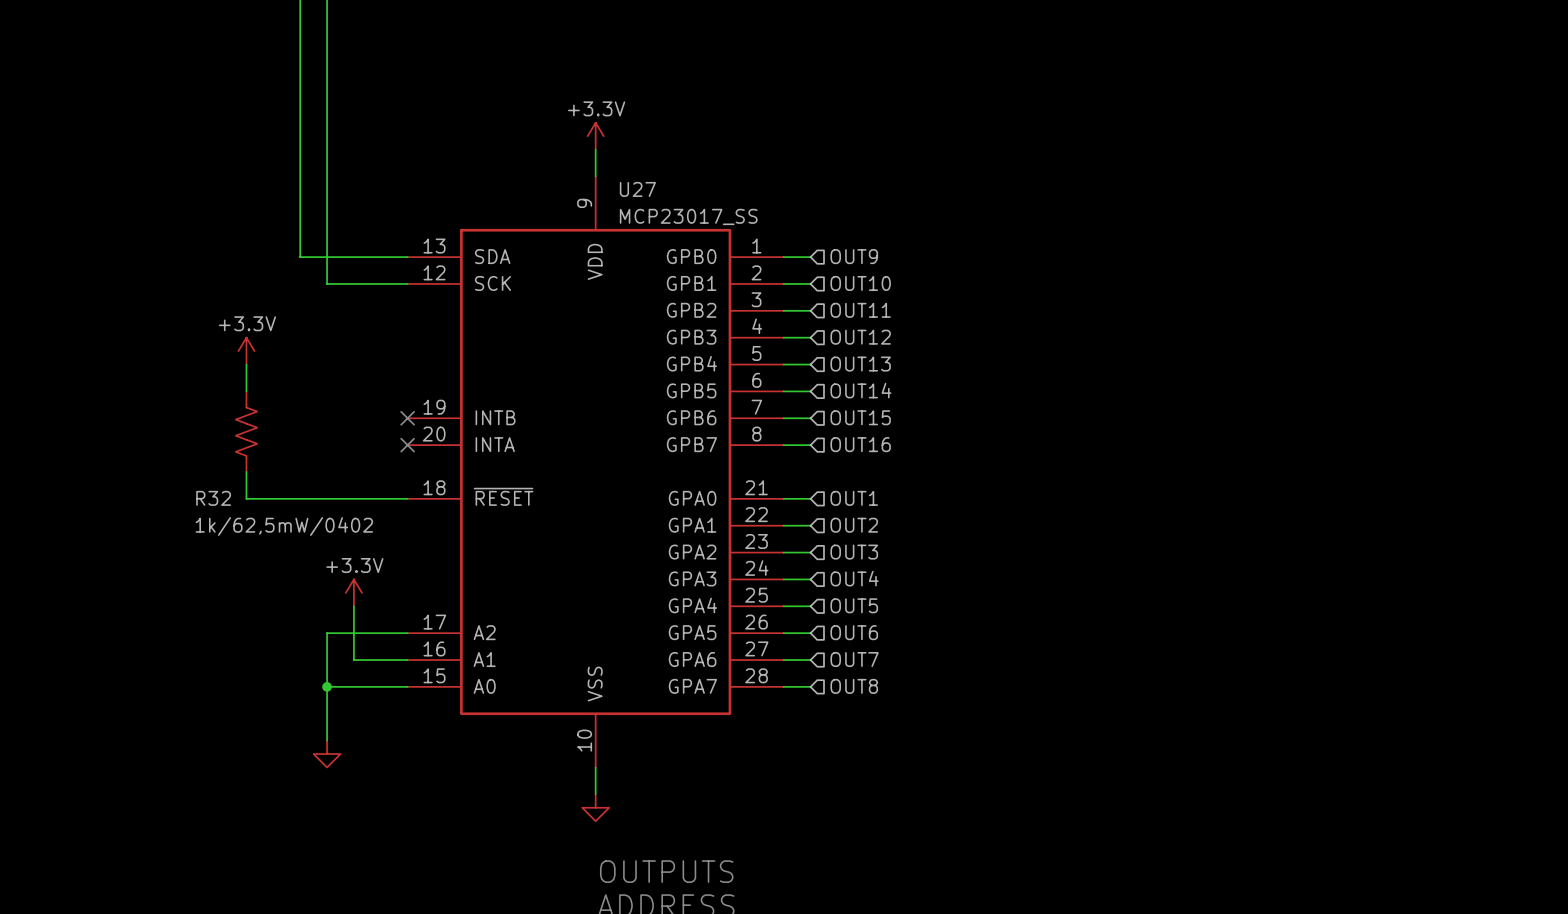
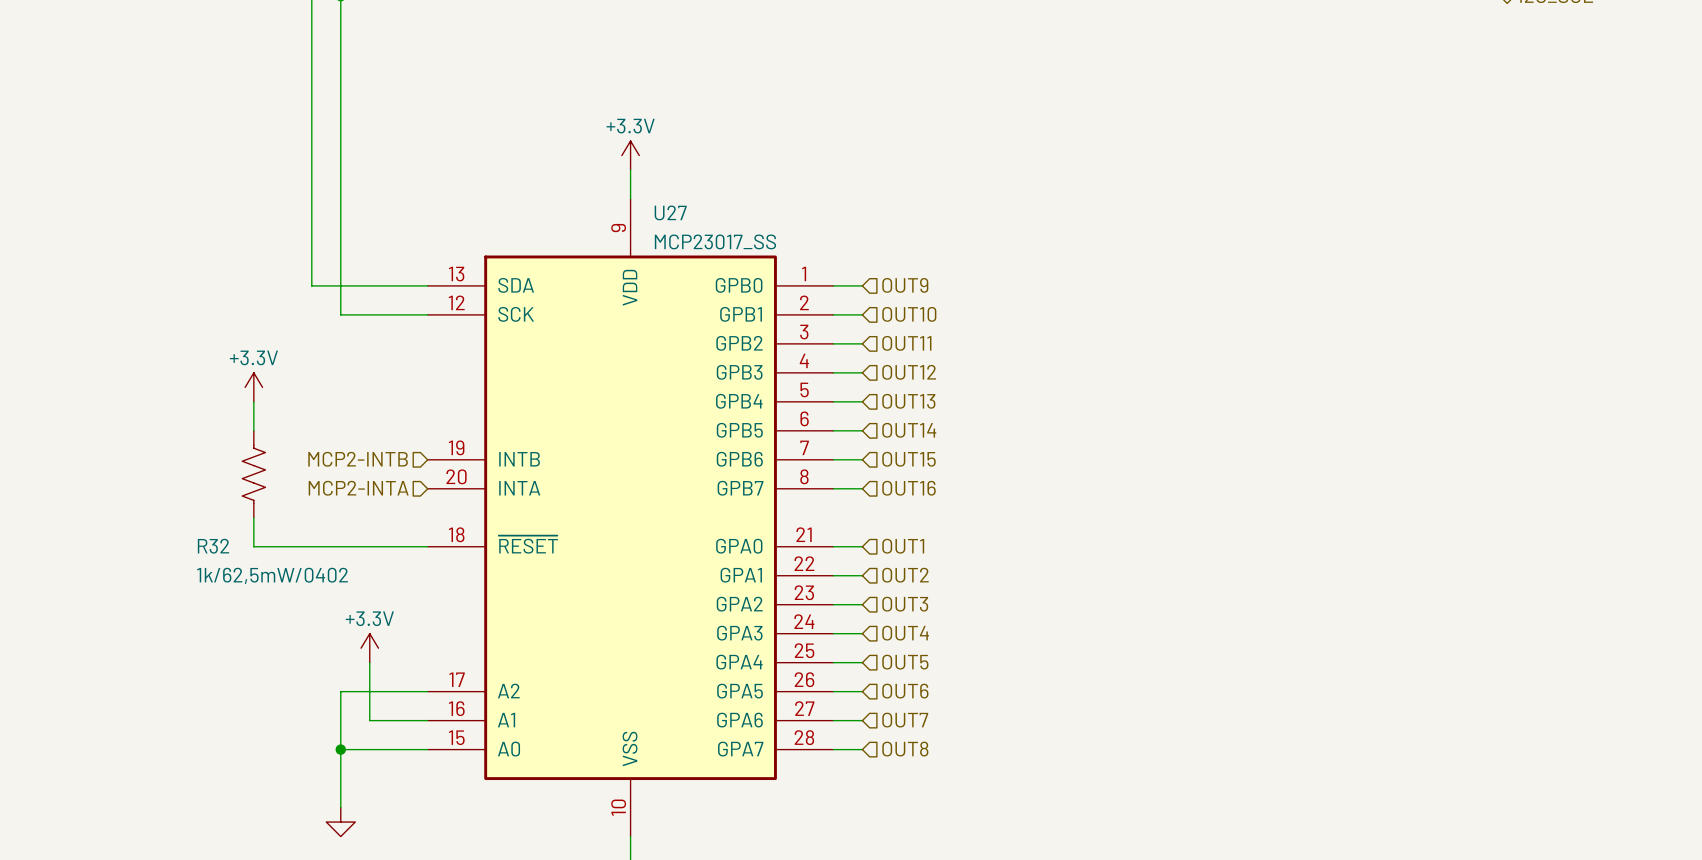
hierarchical label: none -> MCP2-INTB (358, 459)
no-connect mark: (407, 418) -> none
hierarchical label: none -> MCP2-INTA (358, 488)
no-connect mark: (407, 445) -> none

